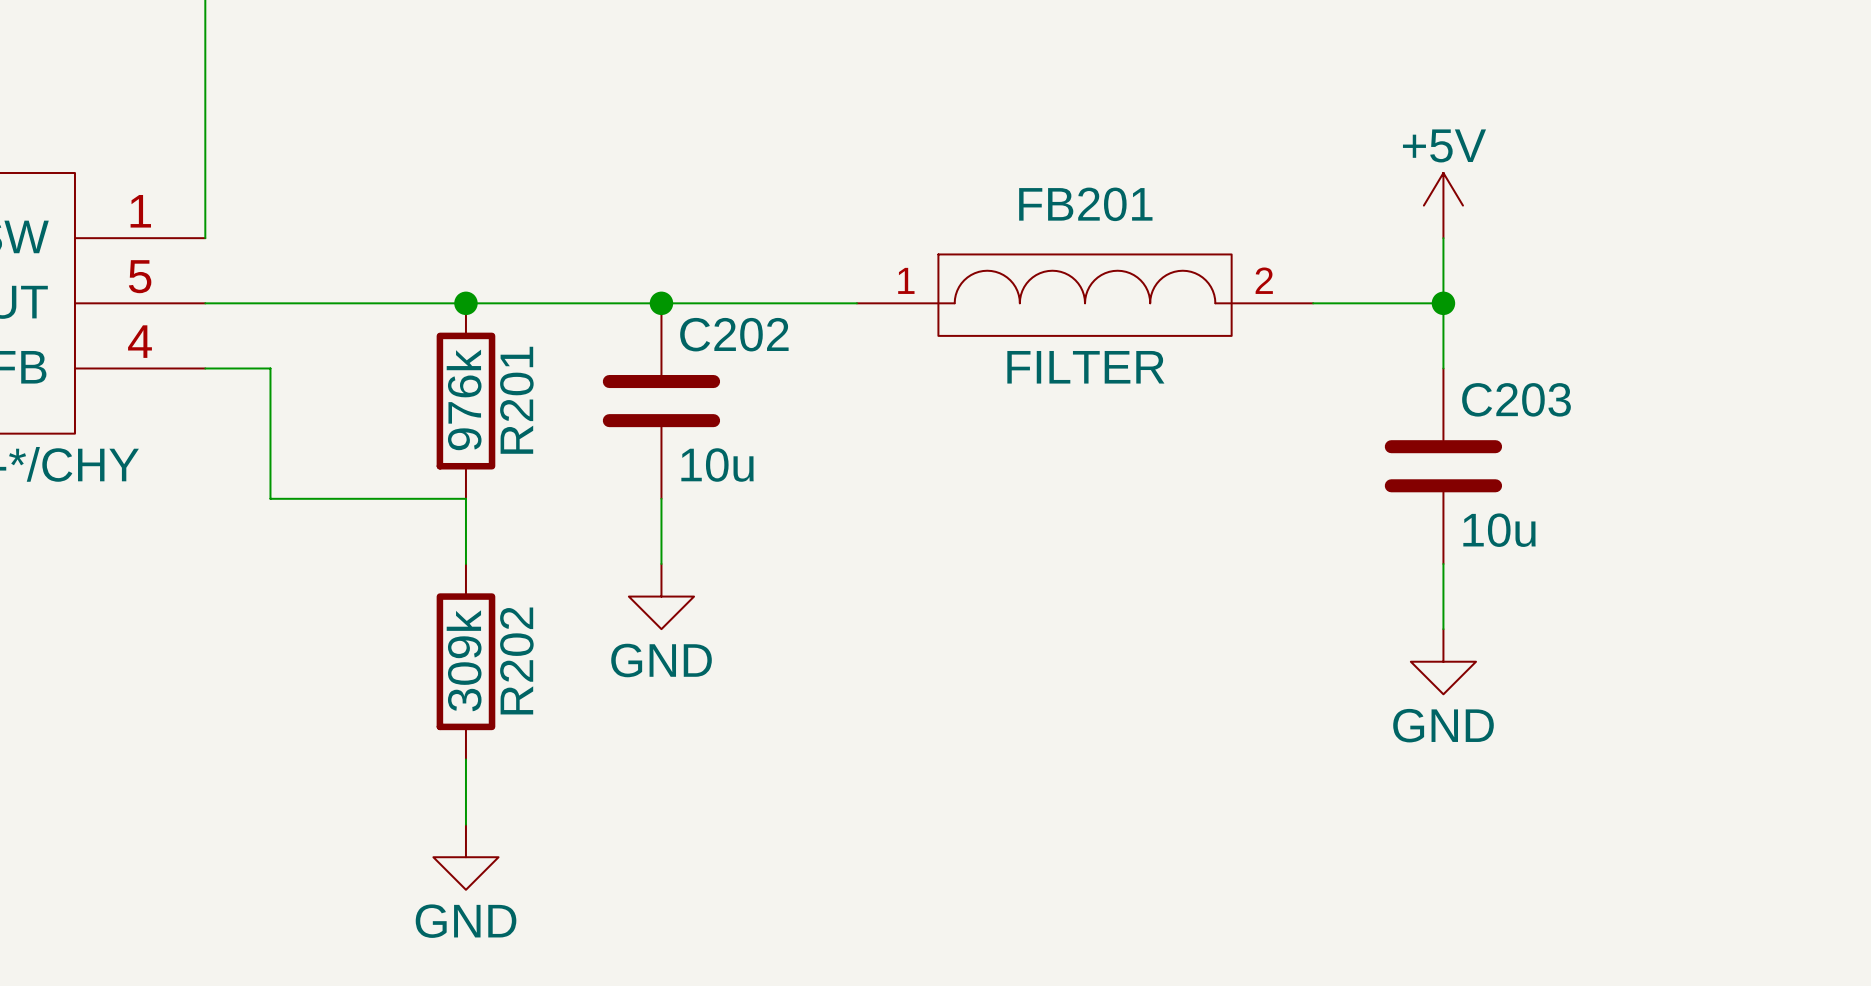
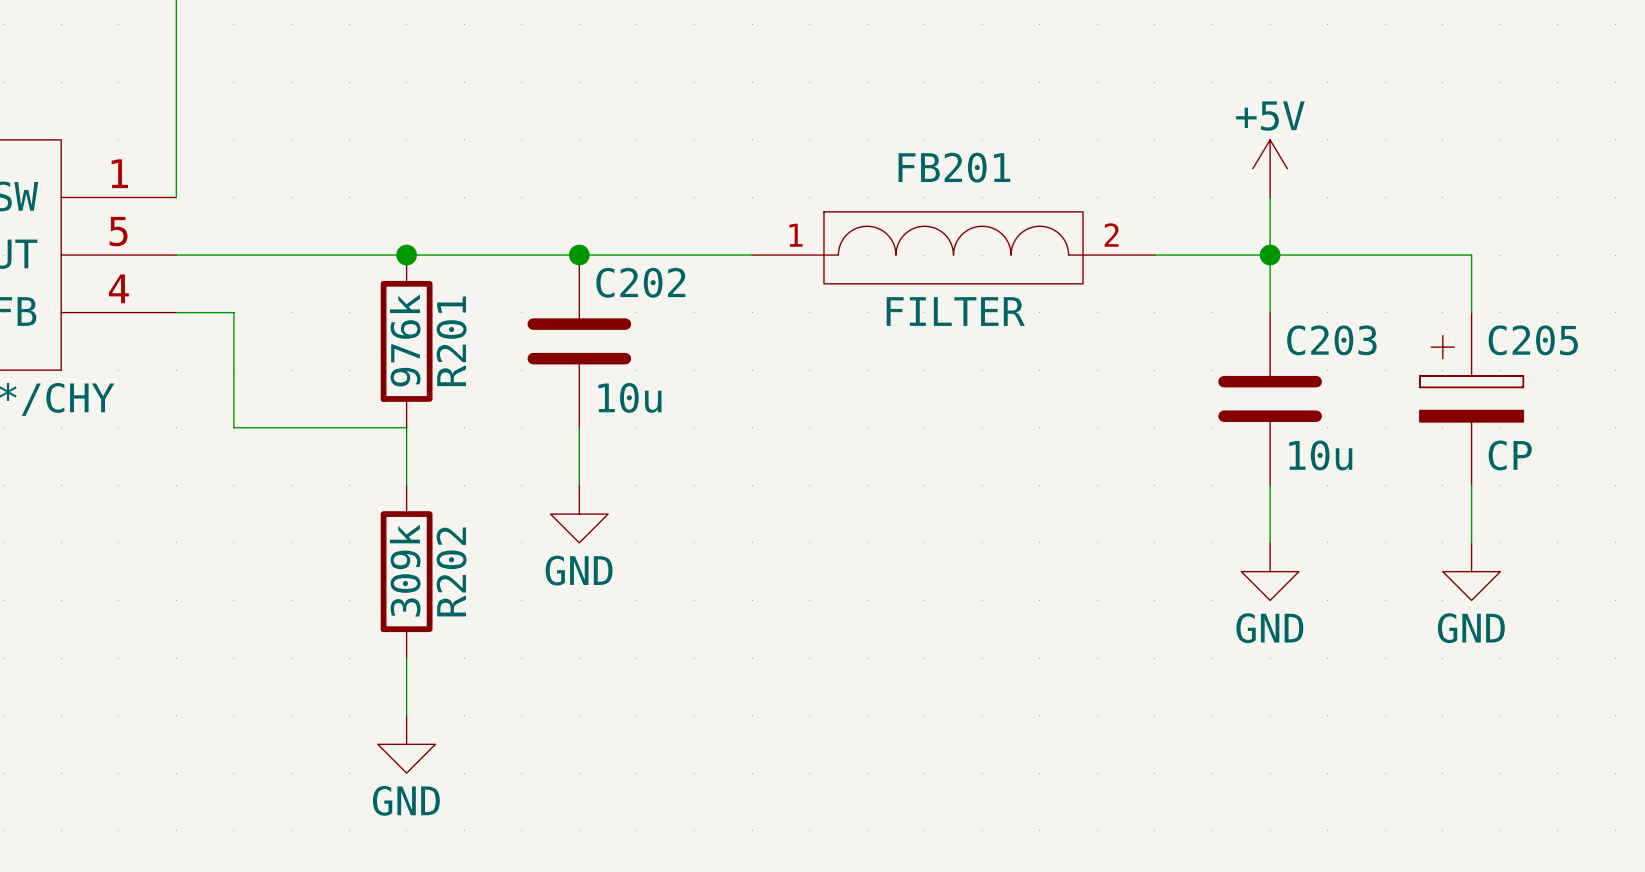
wire: none -> (1270, 255) (1471, 255) (1471, 312)
C205: none -> CP (1471, 398)
wire: none -> (1471, 485) (1471, 542)
power symbol: none -> GND (1471, 571)

